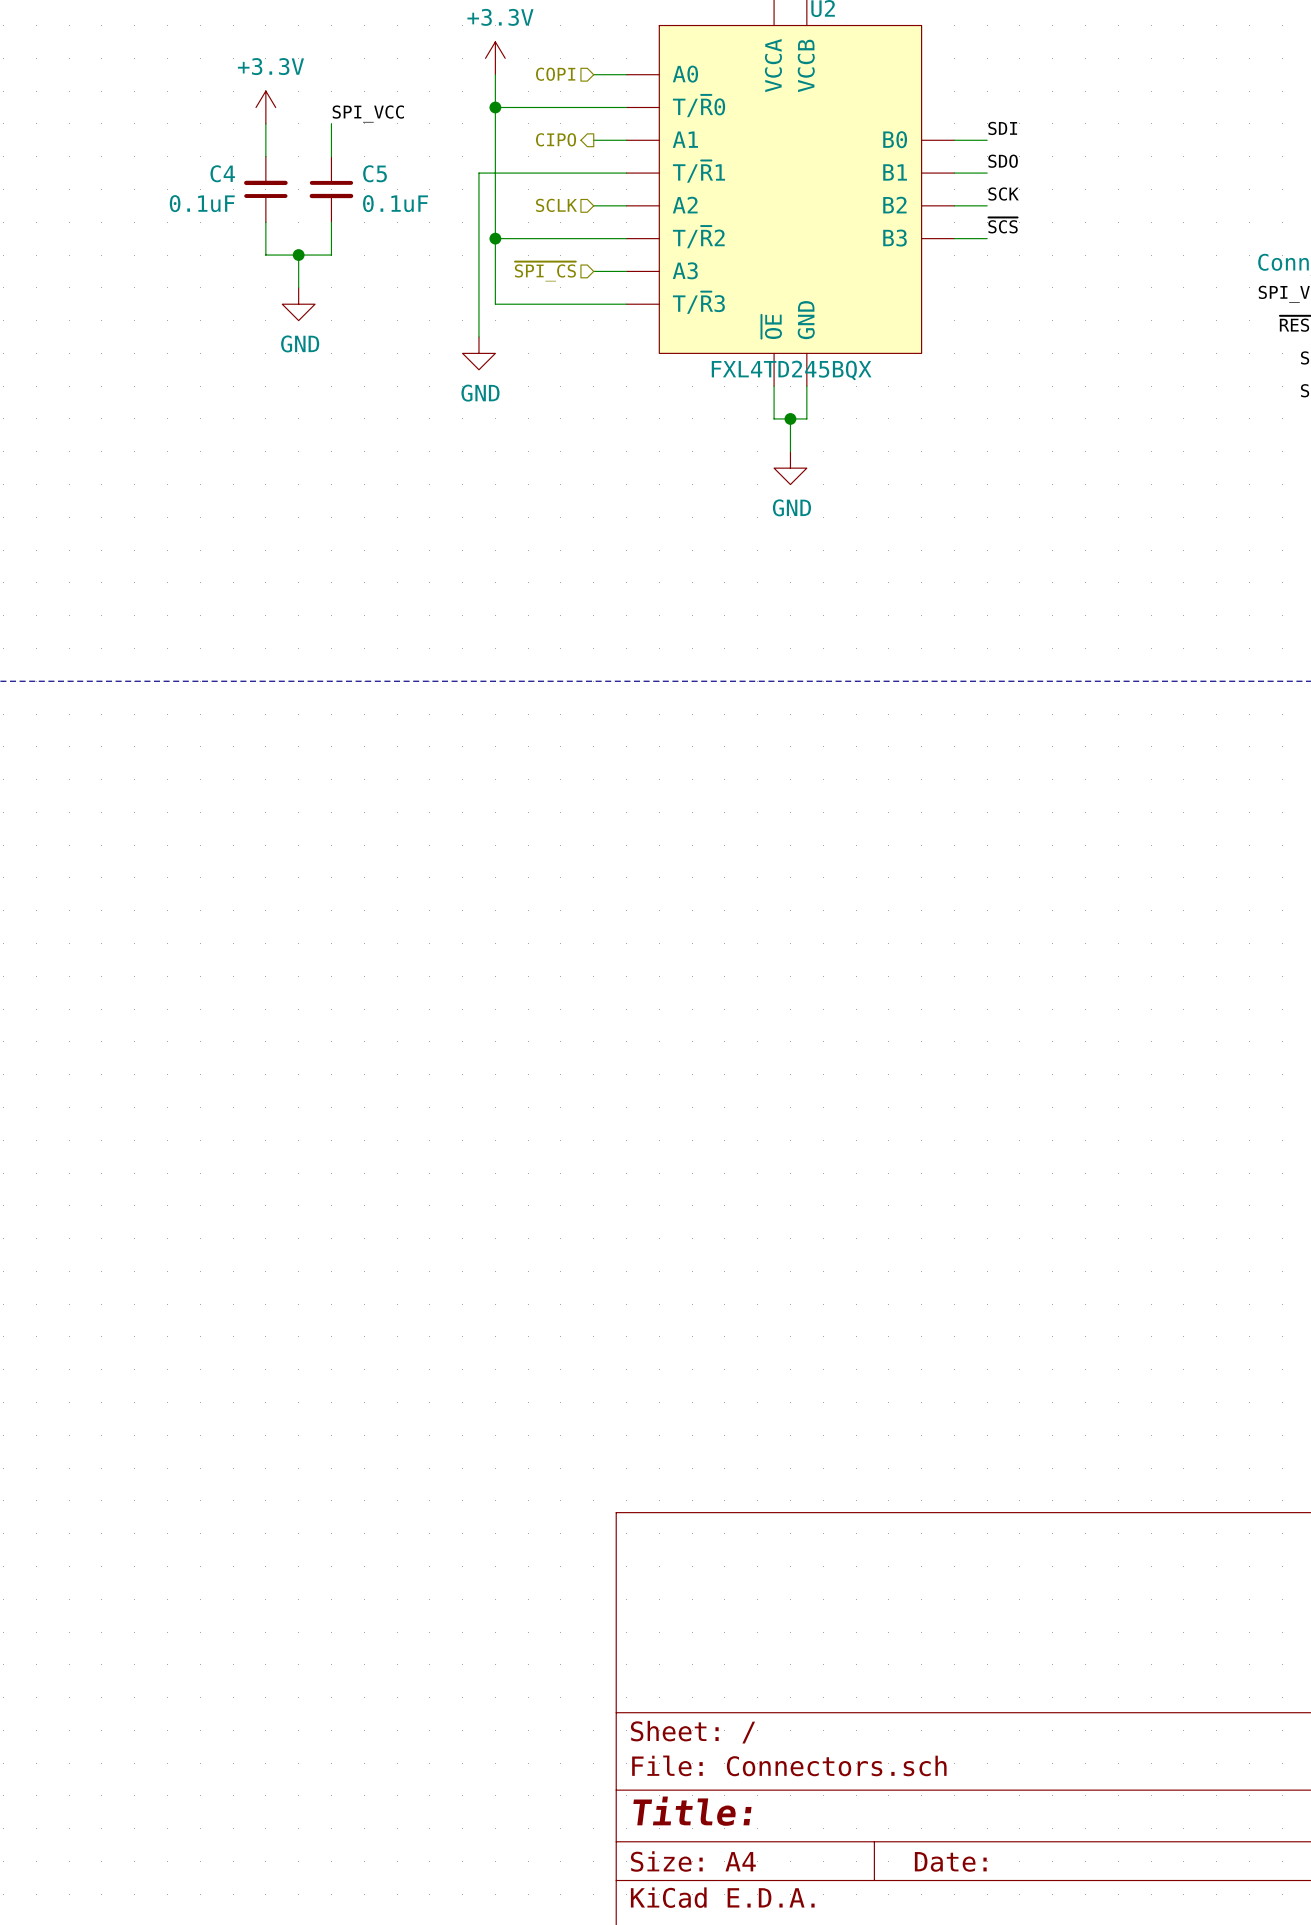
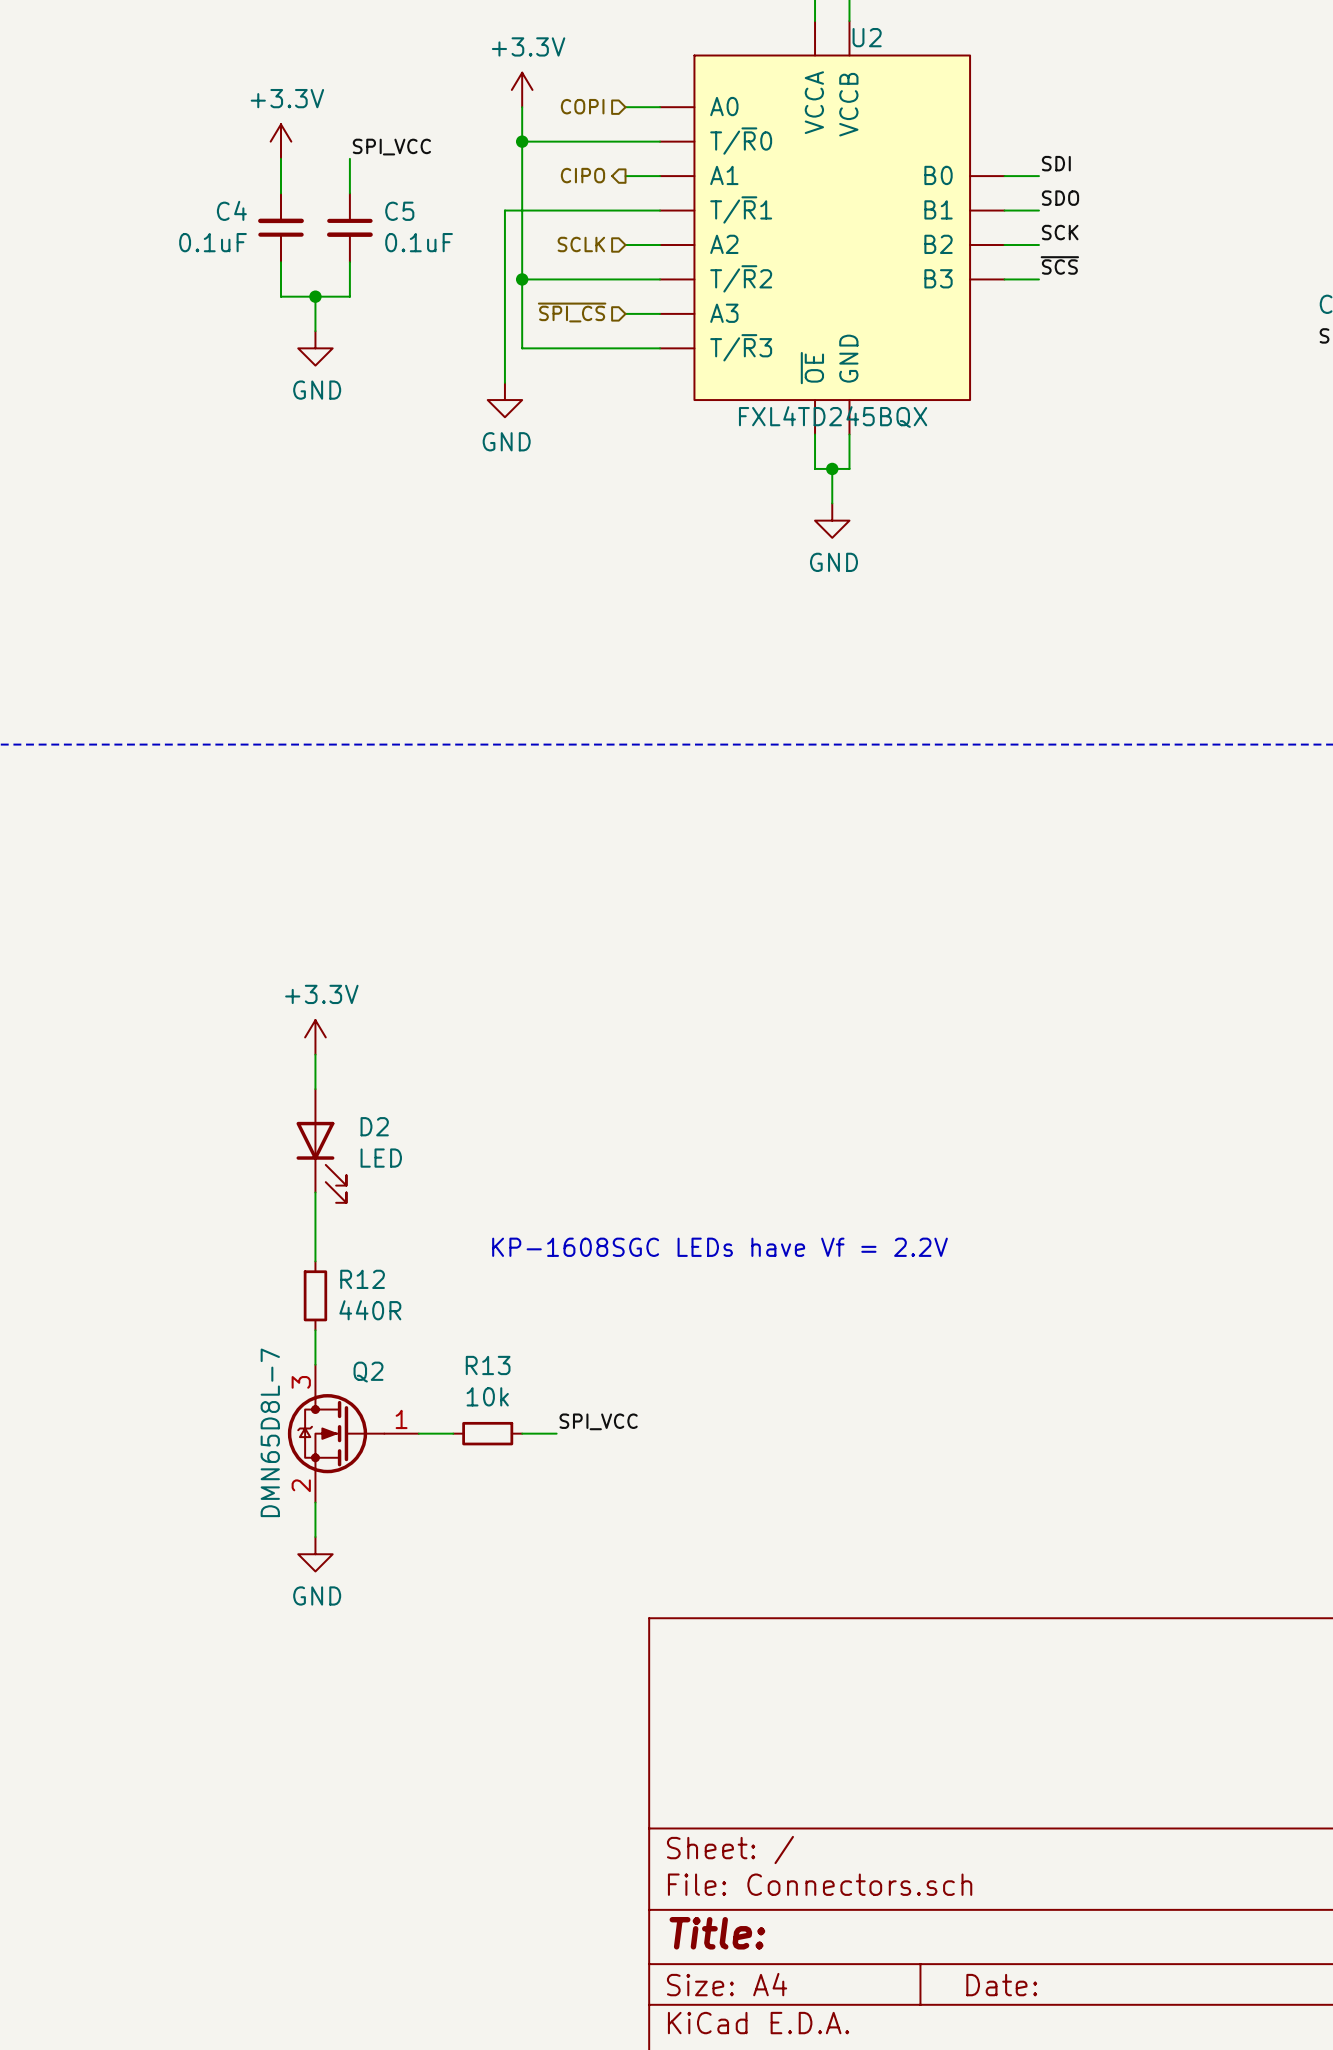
power symbol: none -> +3.3V (315, 1037)
wire: none -> (315, 1054) (315, 1089)
D2: none -> LED (321, 1145)
wire: none -> (315, 1192) (315, 1261)
text: none -> KP-1608SGC LEDs have Vf = 2.2V (720, 1247)
R12: none -> 440R (315, 1295)
wire: none -> (315, 1330) (315, 1364)
label: none -> SPI_VCC (598, 1421)
Q2: none -> DMN65D8L-7 (353, 1433)
wire: none -> (418, 1433) (453, 1433)
R13: none -> 10k (487, 1433)
wire: none -> (522, 1433) (556, 1433)
wire: none -> (315, 1502) (315, 1537)
power symbol: none -> GND (315, 1554)

